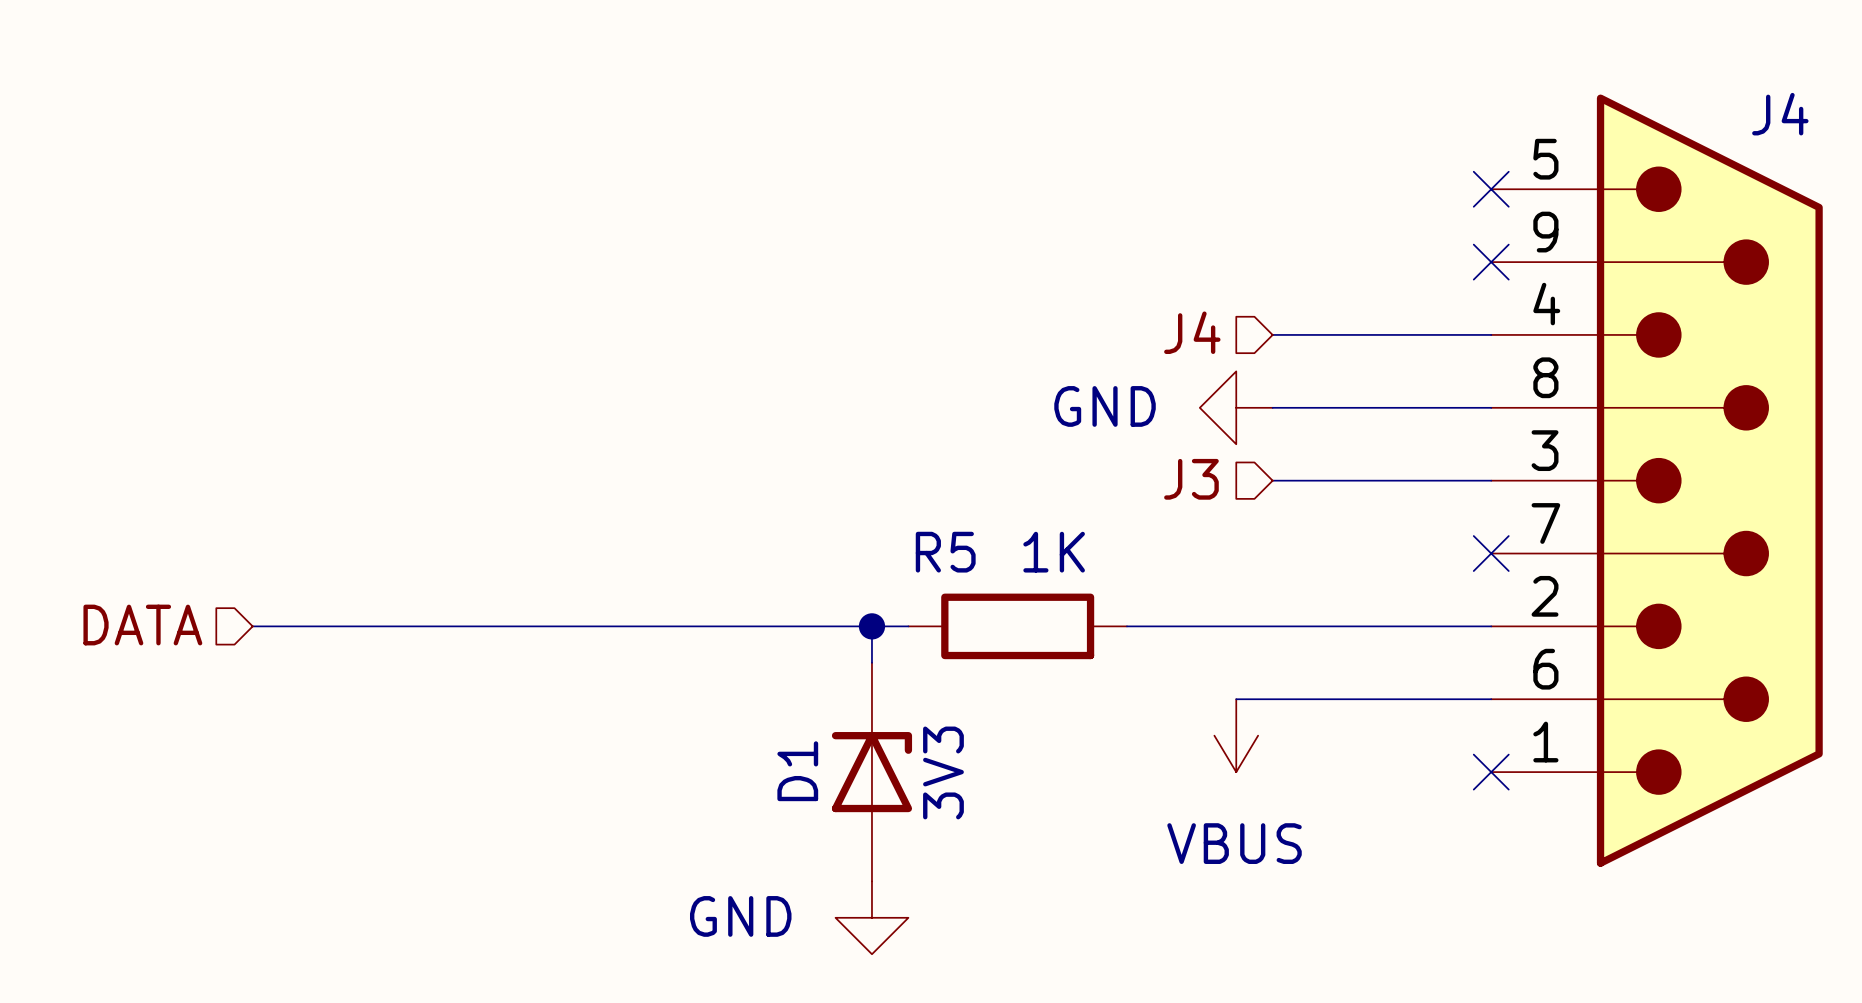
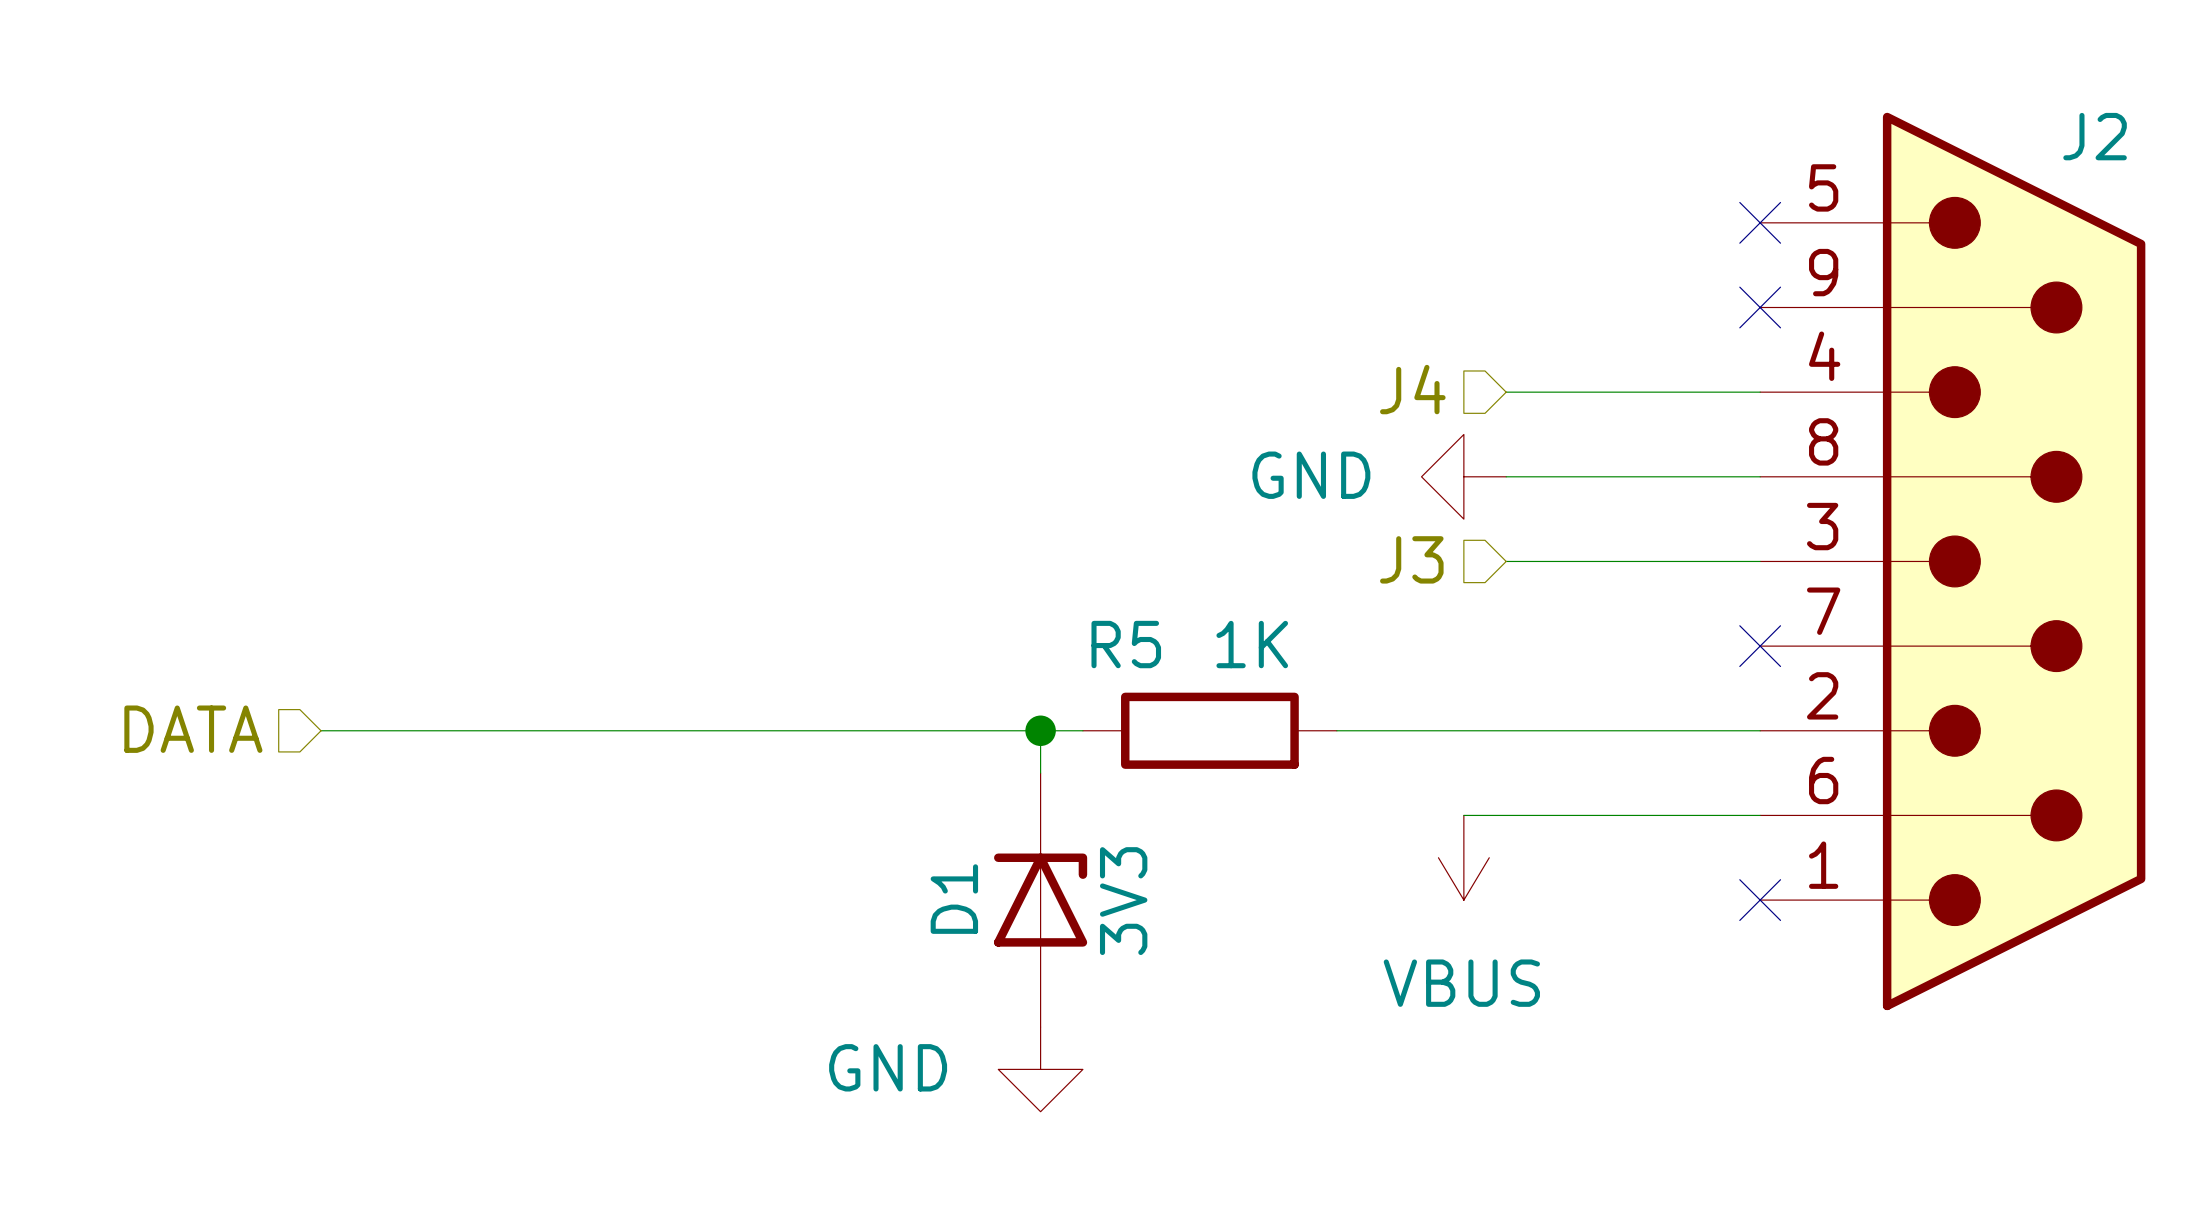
J4 name: J4 (1780, 114) -> J2 (2095, 136)

